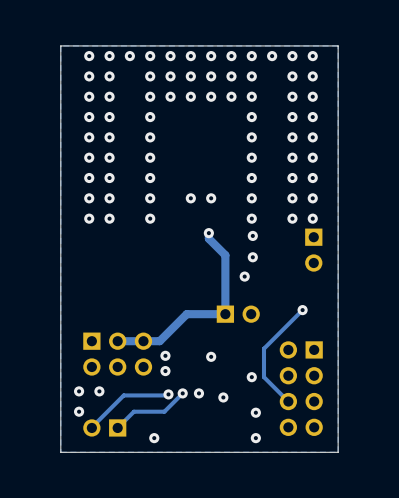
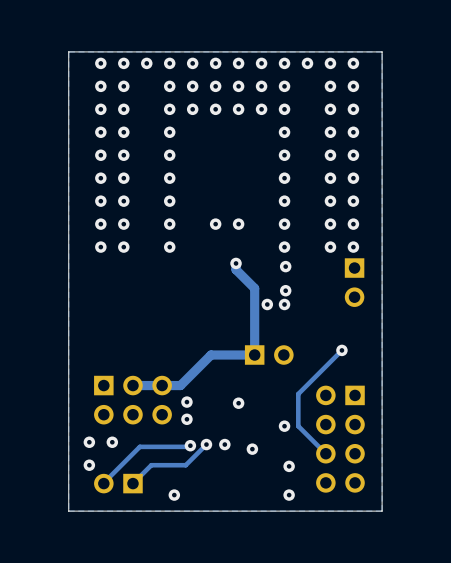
via: none -> (267, 304)
via: none -> (284, 304)
via: (244, 276) -> none

